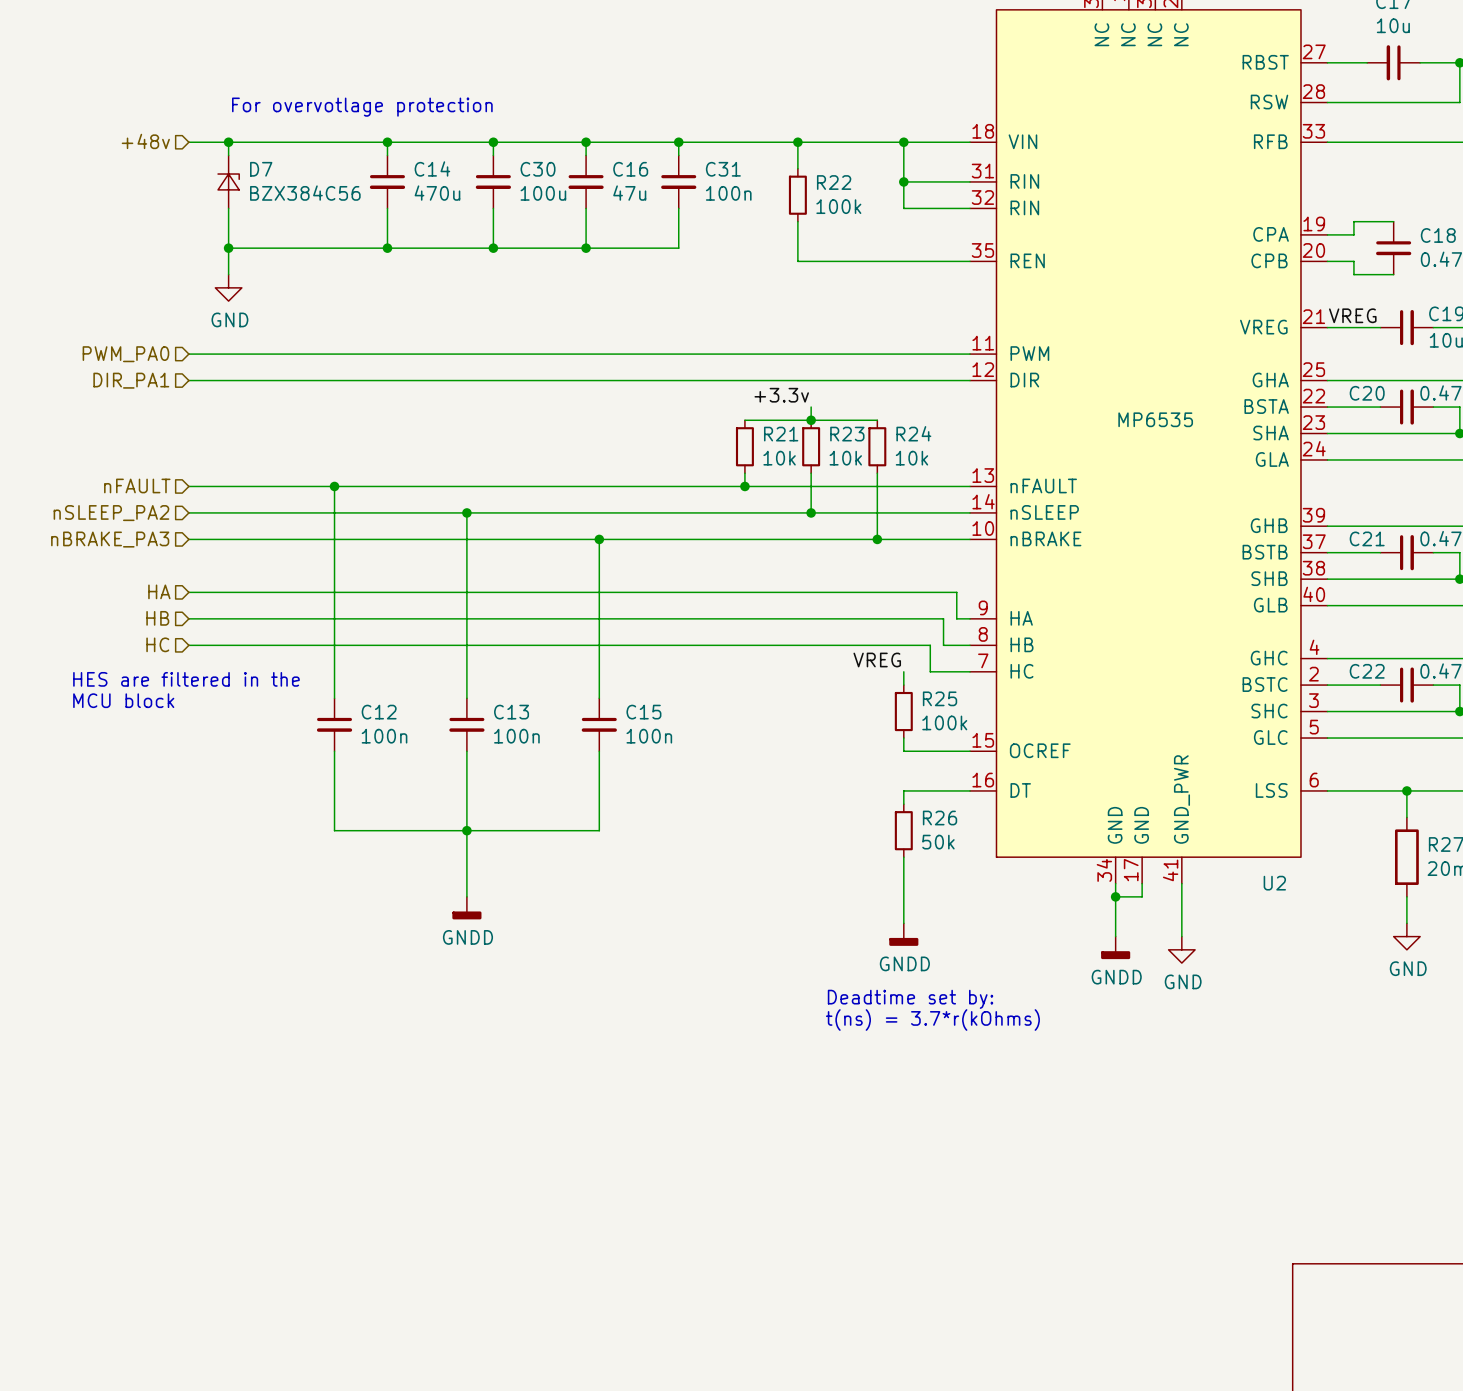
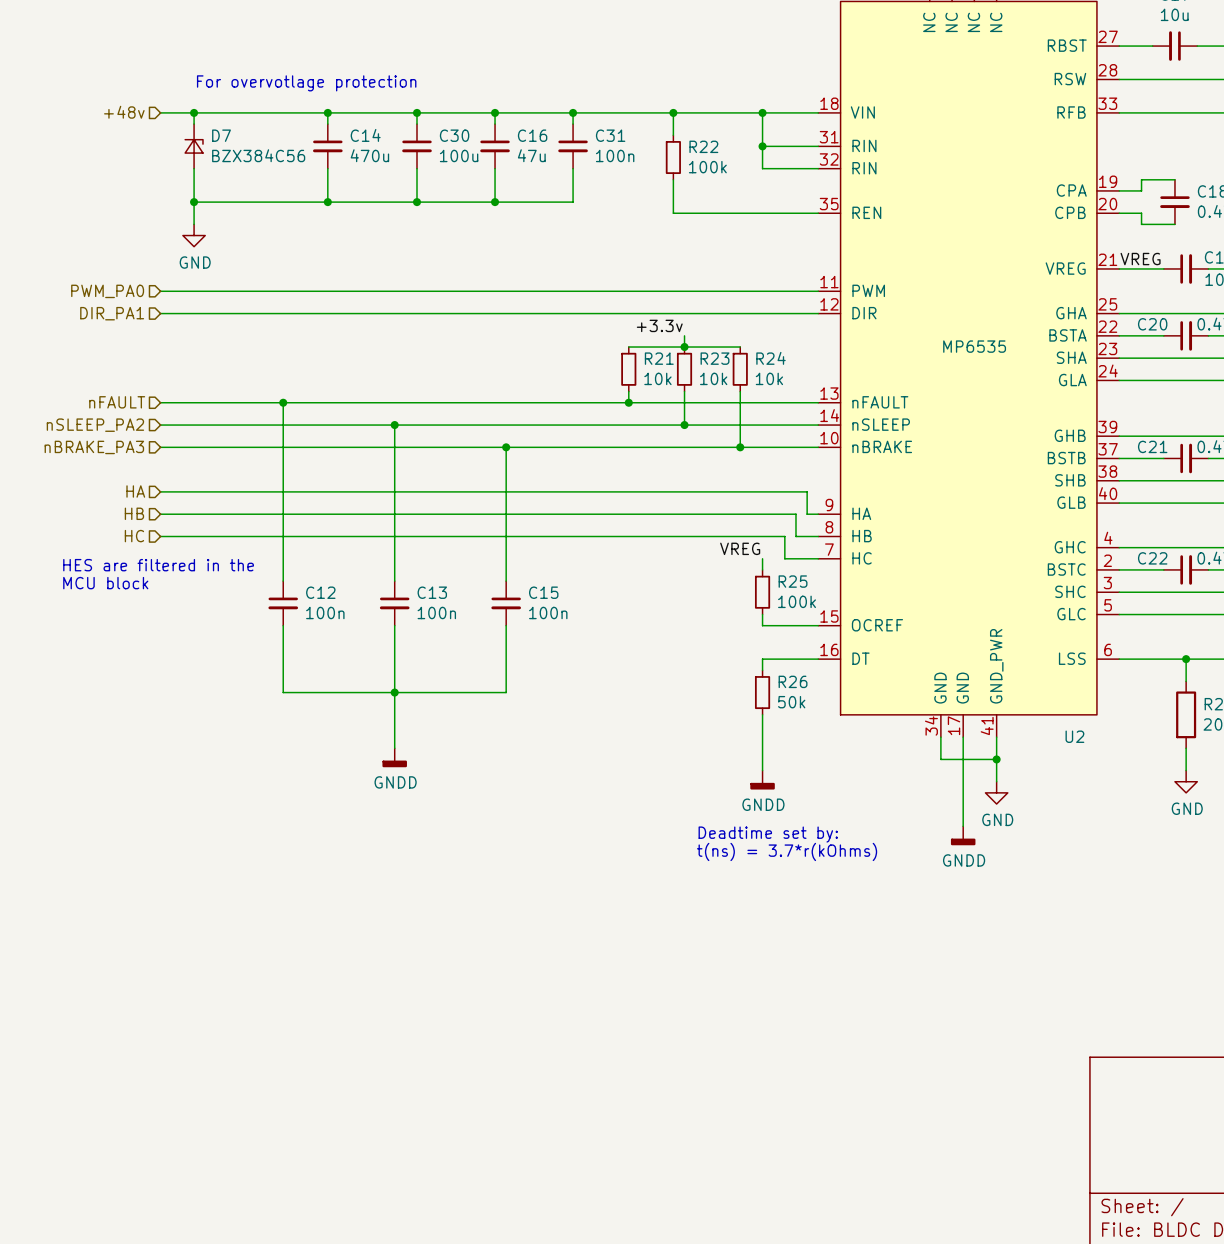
wire: (1115, 896) (1142, 896) -> (963, 826) (963, 748)
junction: (1115, 896) -> none
wire: (1115, 910) (1115, 936) -> (940, 759) (996, 759)
junction: none -> (996, 759)
power symbol position: GNDD (1115, 947) -> GNDD (963, 835)

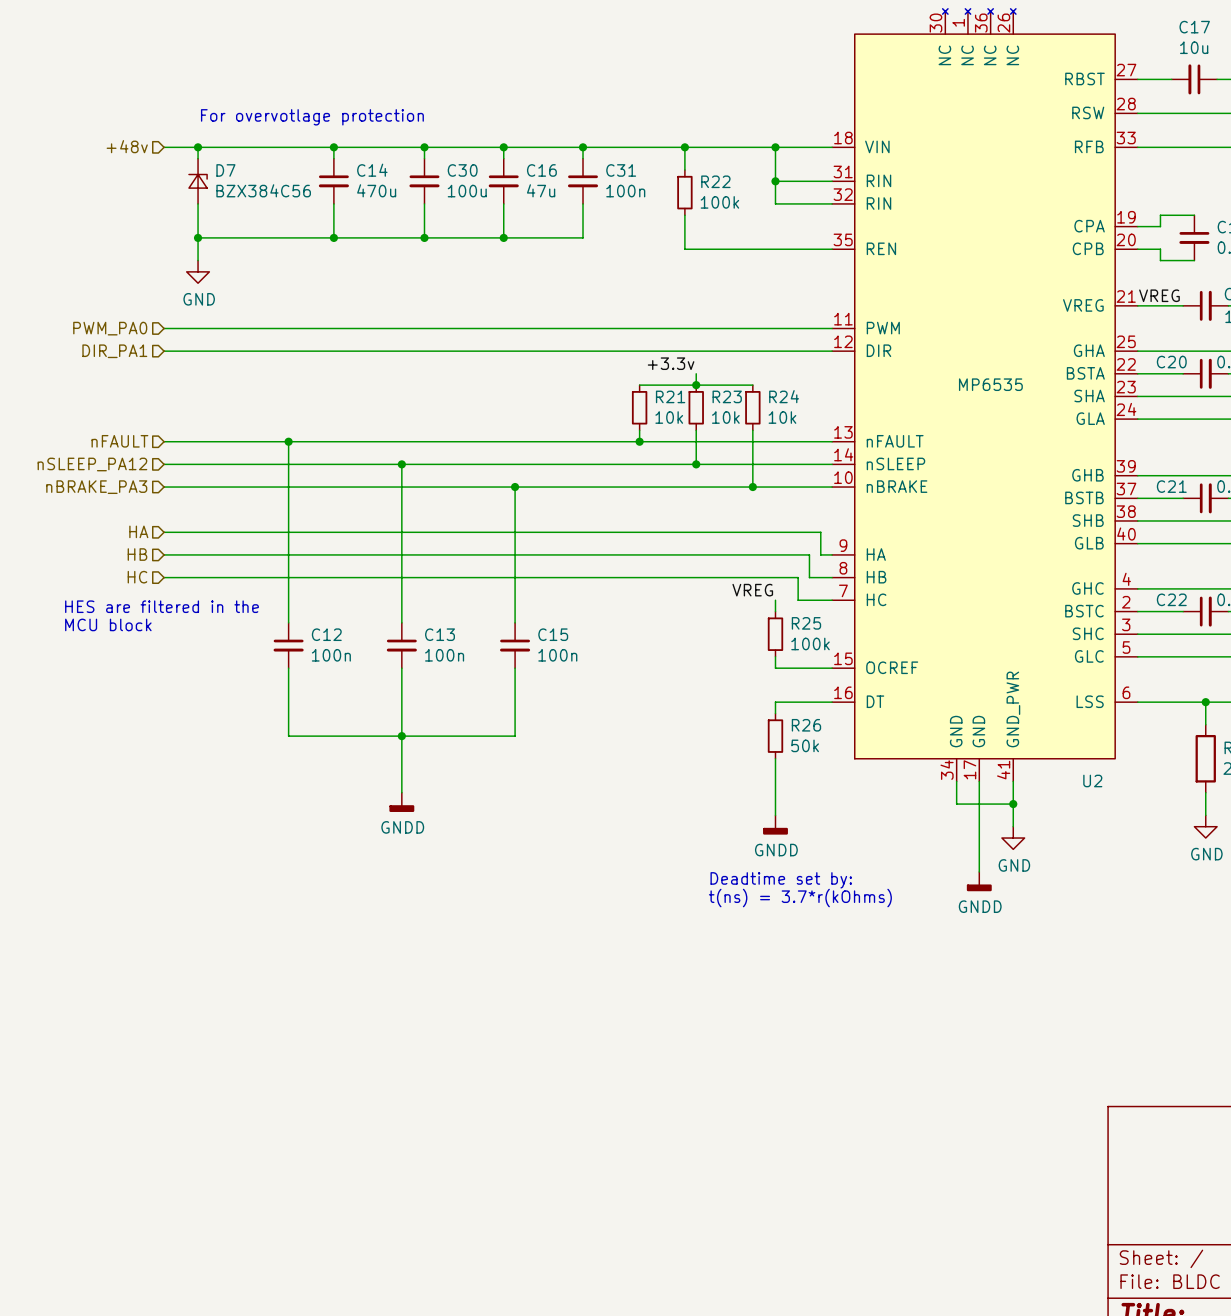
hierarchical label: nSLEEP_PA2 (95, 425) -> nSLEEP_PA12 (92, 464)

